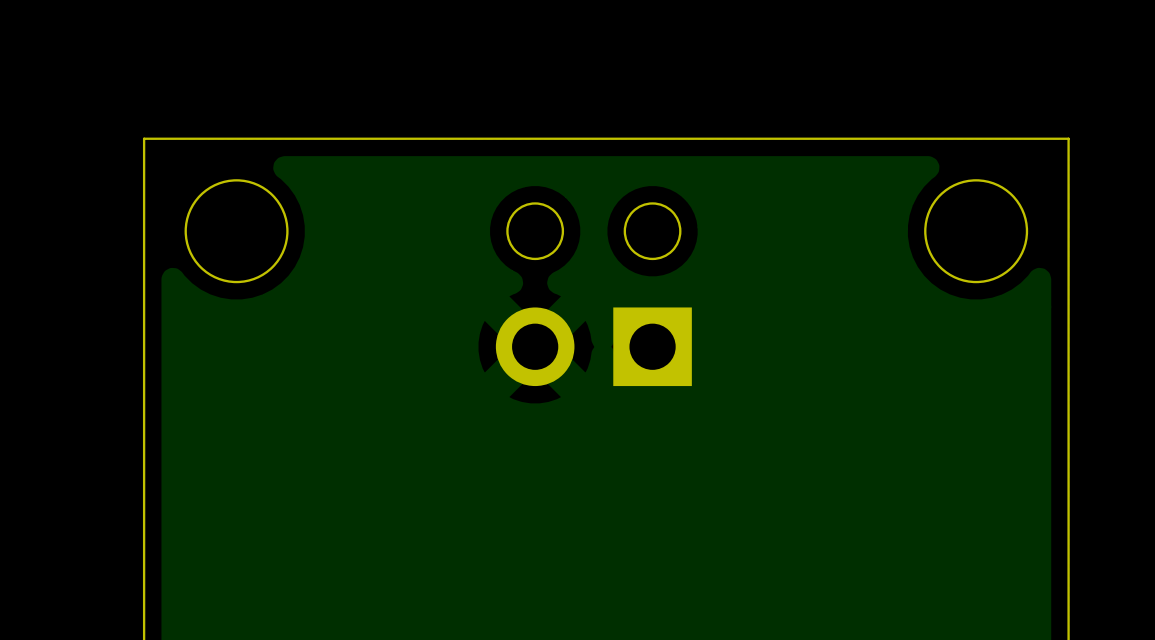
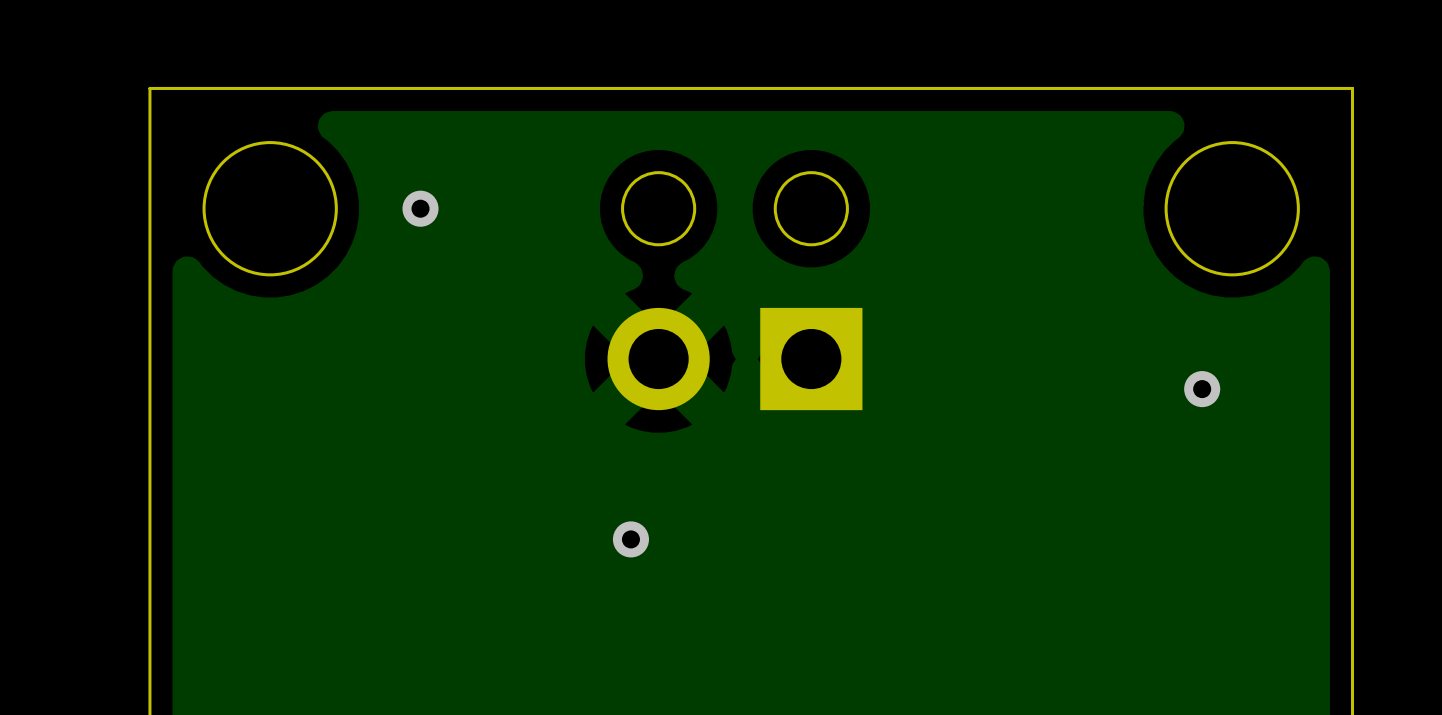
via: none -> (420, 208)
via: none -> (1202, 389)
via: none -> (630, 539)

